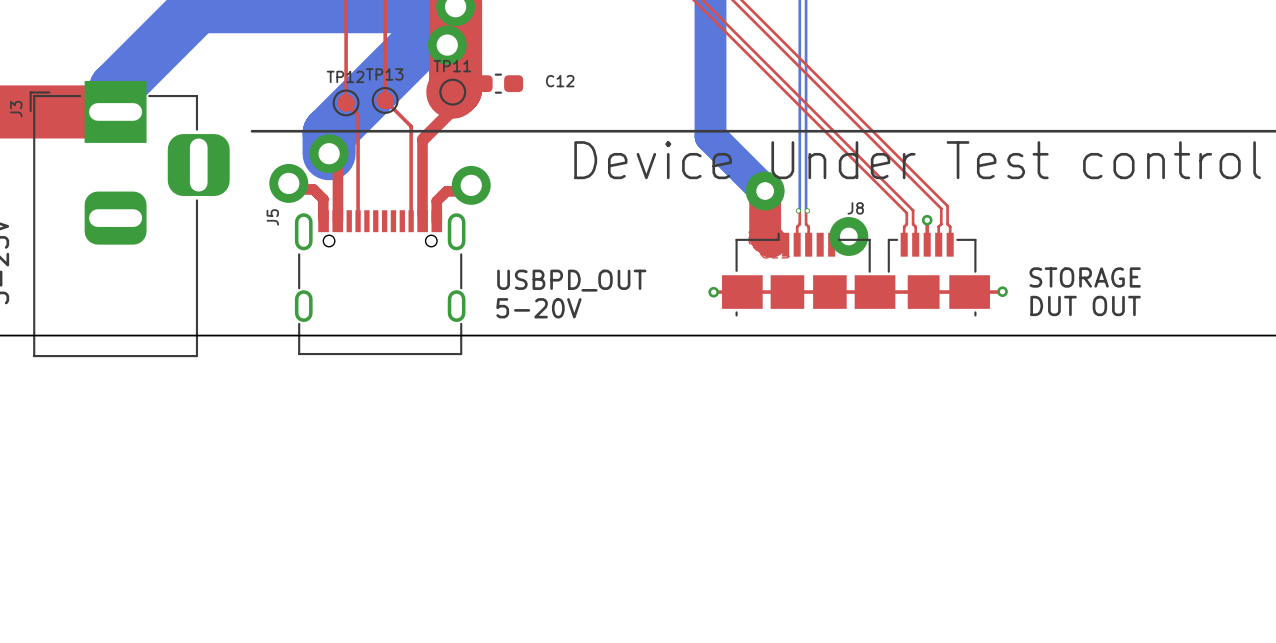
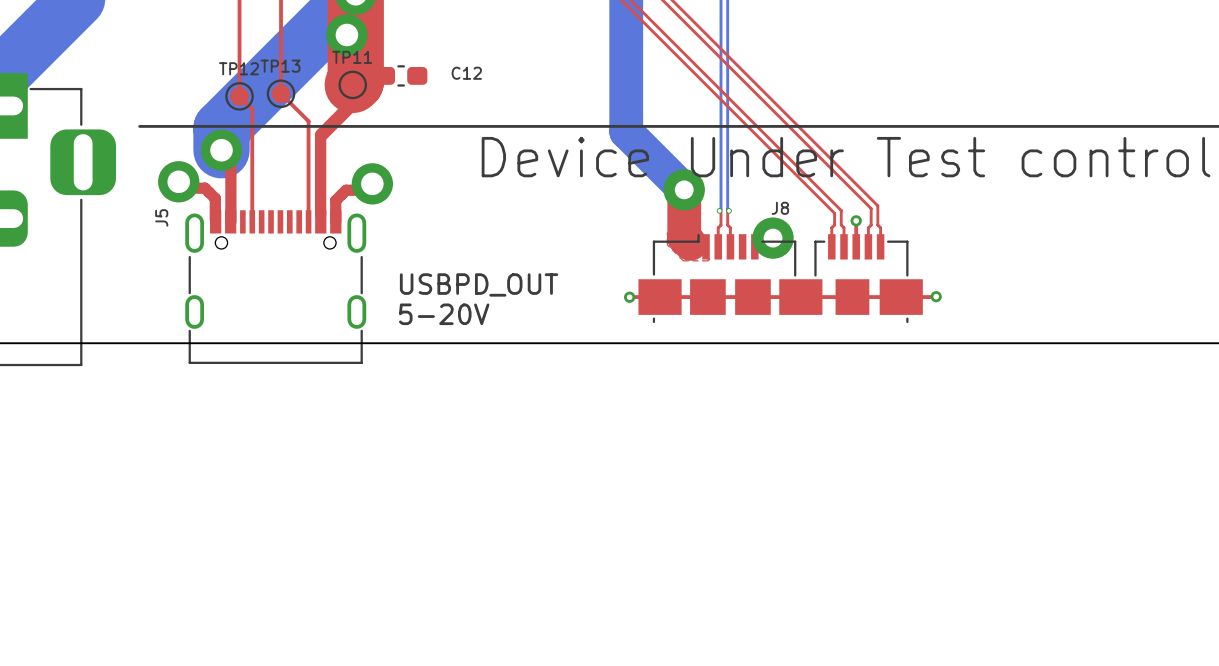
text: STORAGE (1085, 277) -> none
text: DUT OUT (1085, 305) -> none

